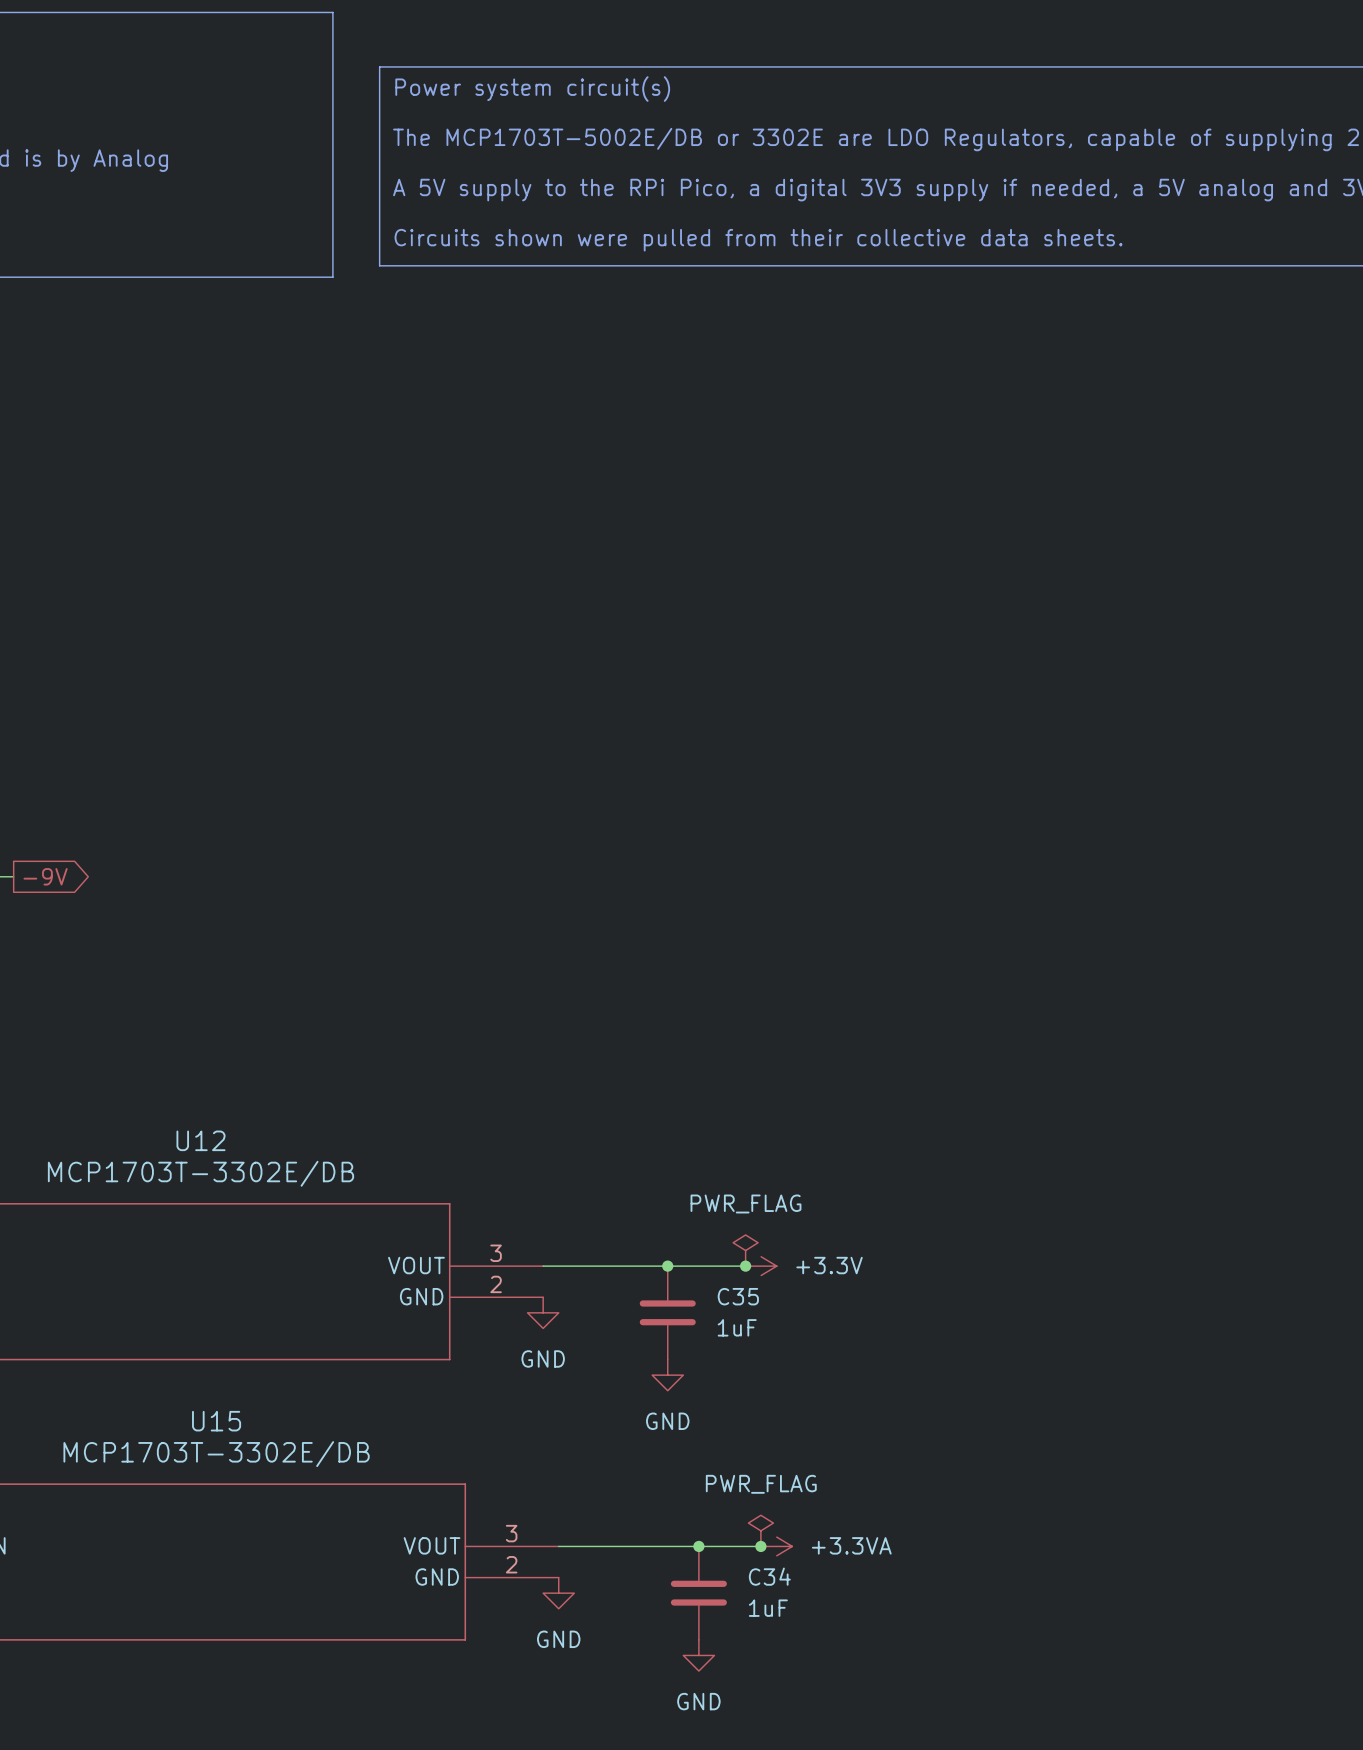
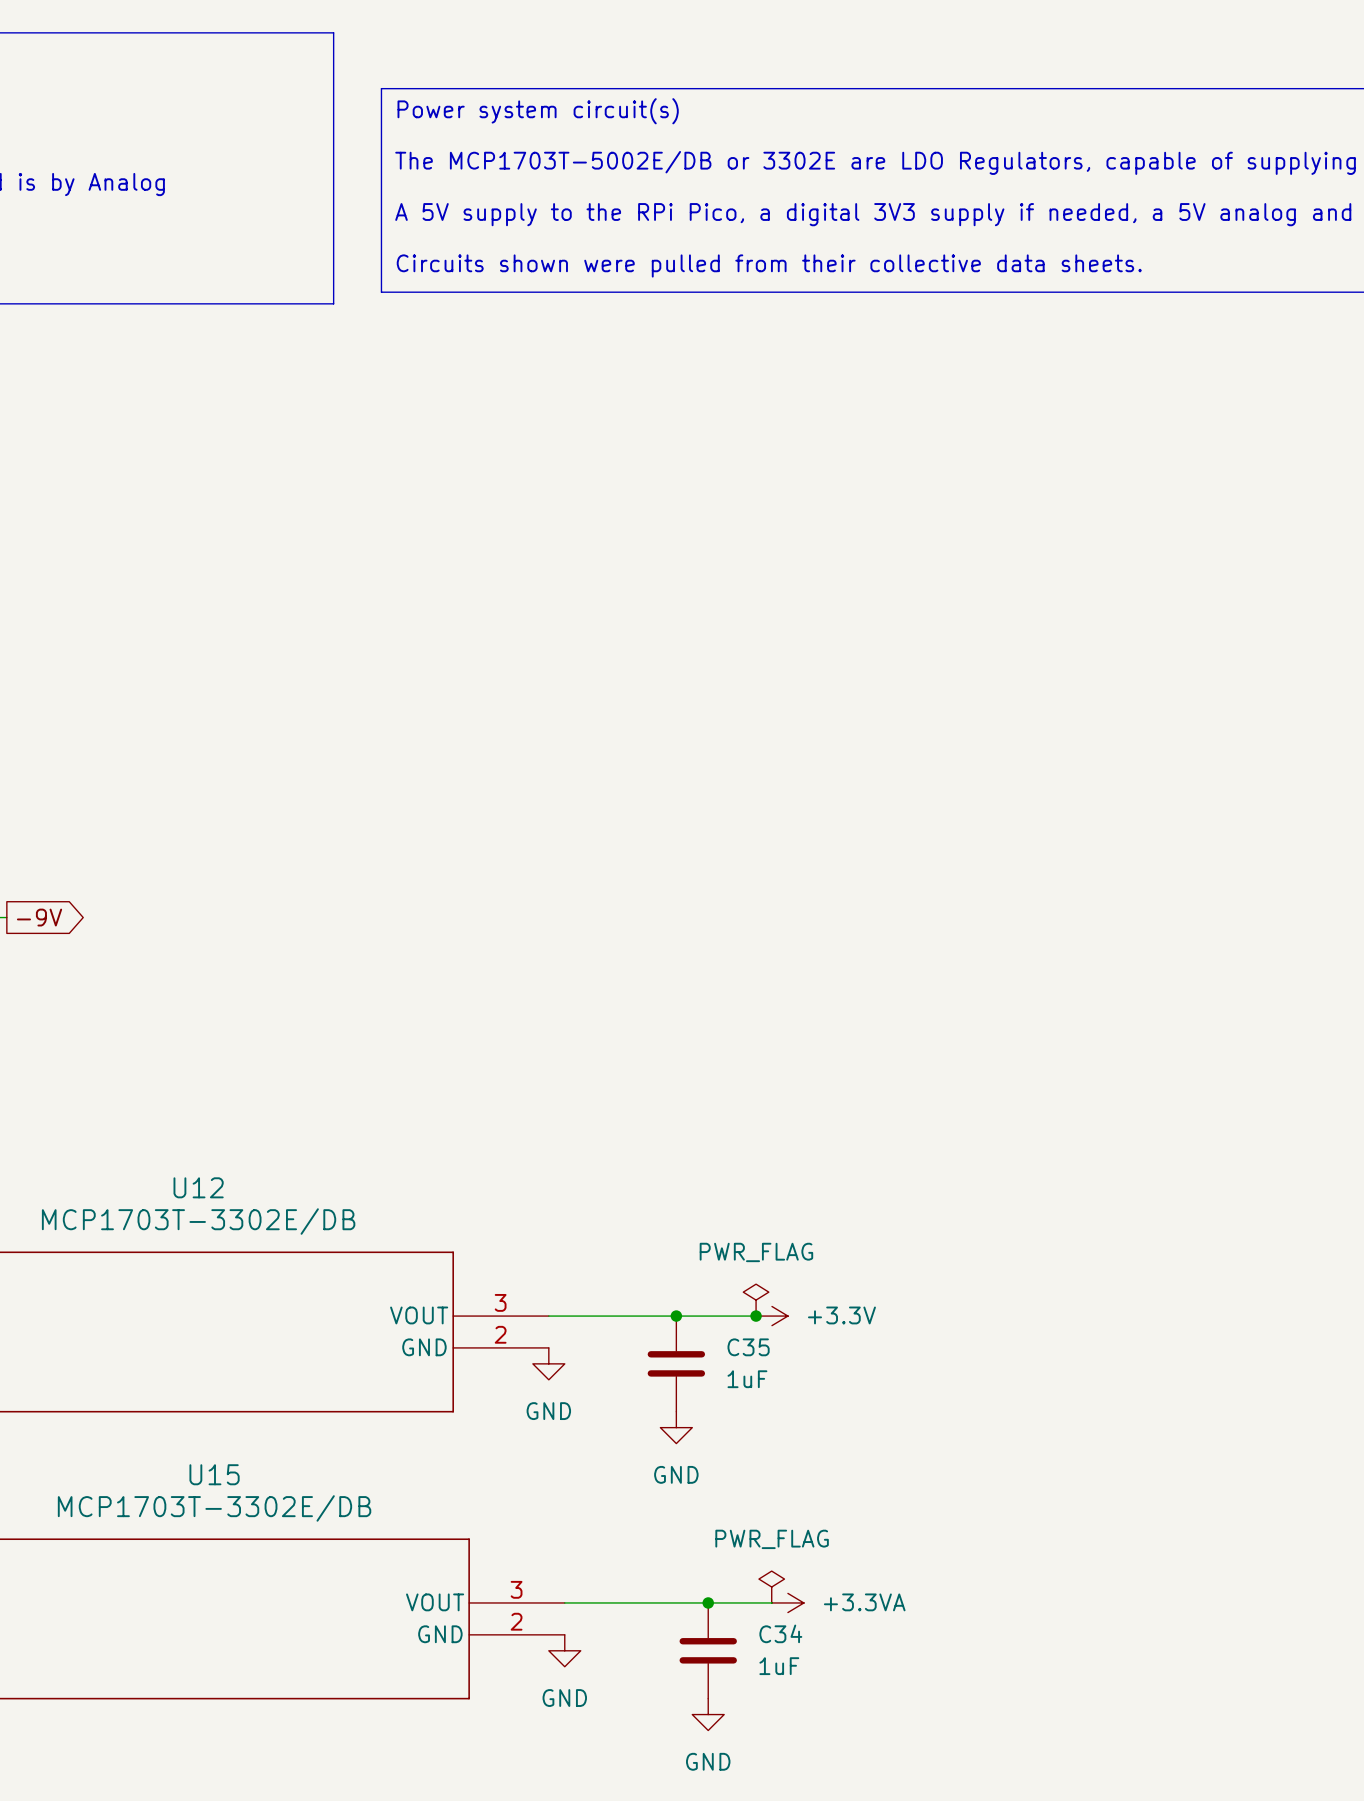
junction: (760, 1546) -> none

